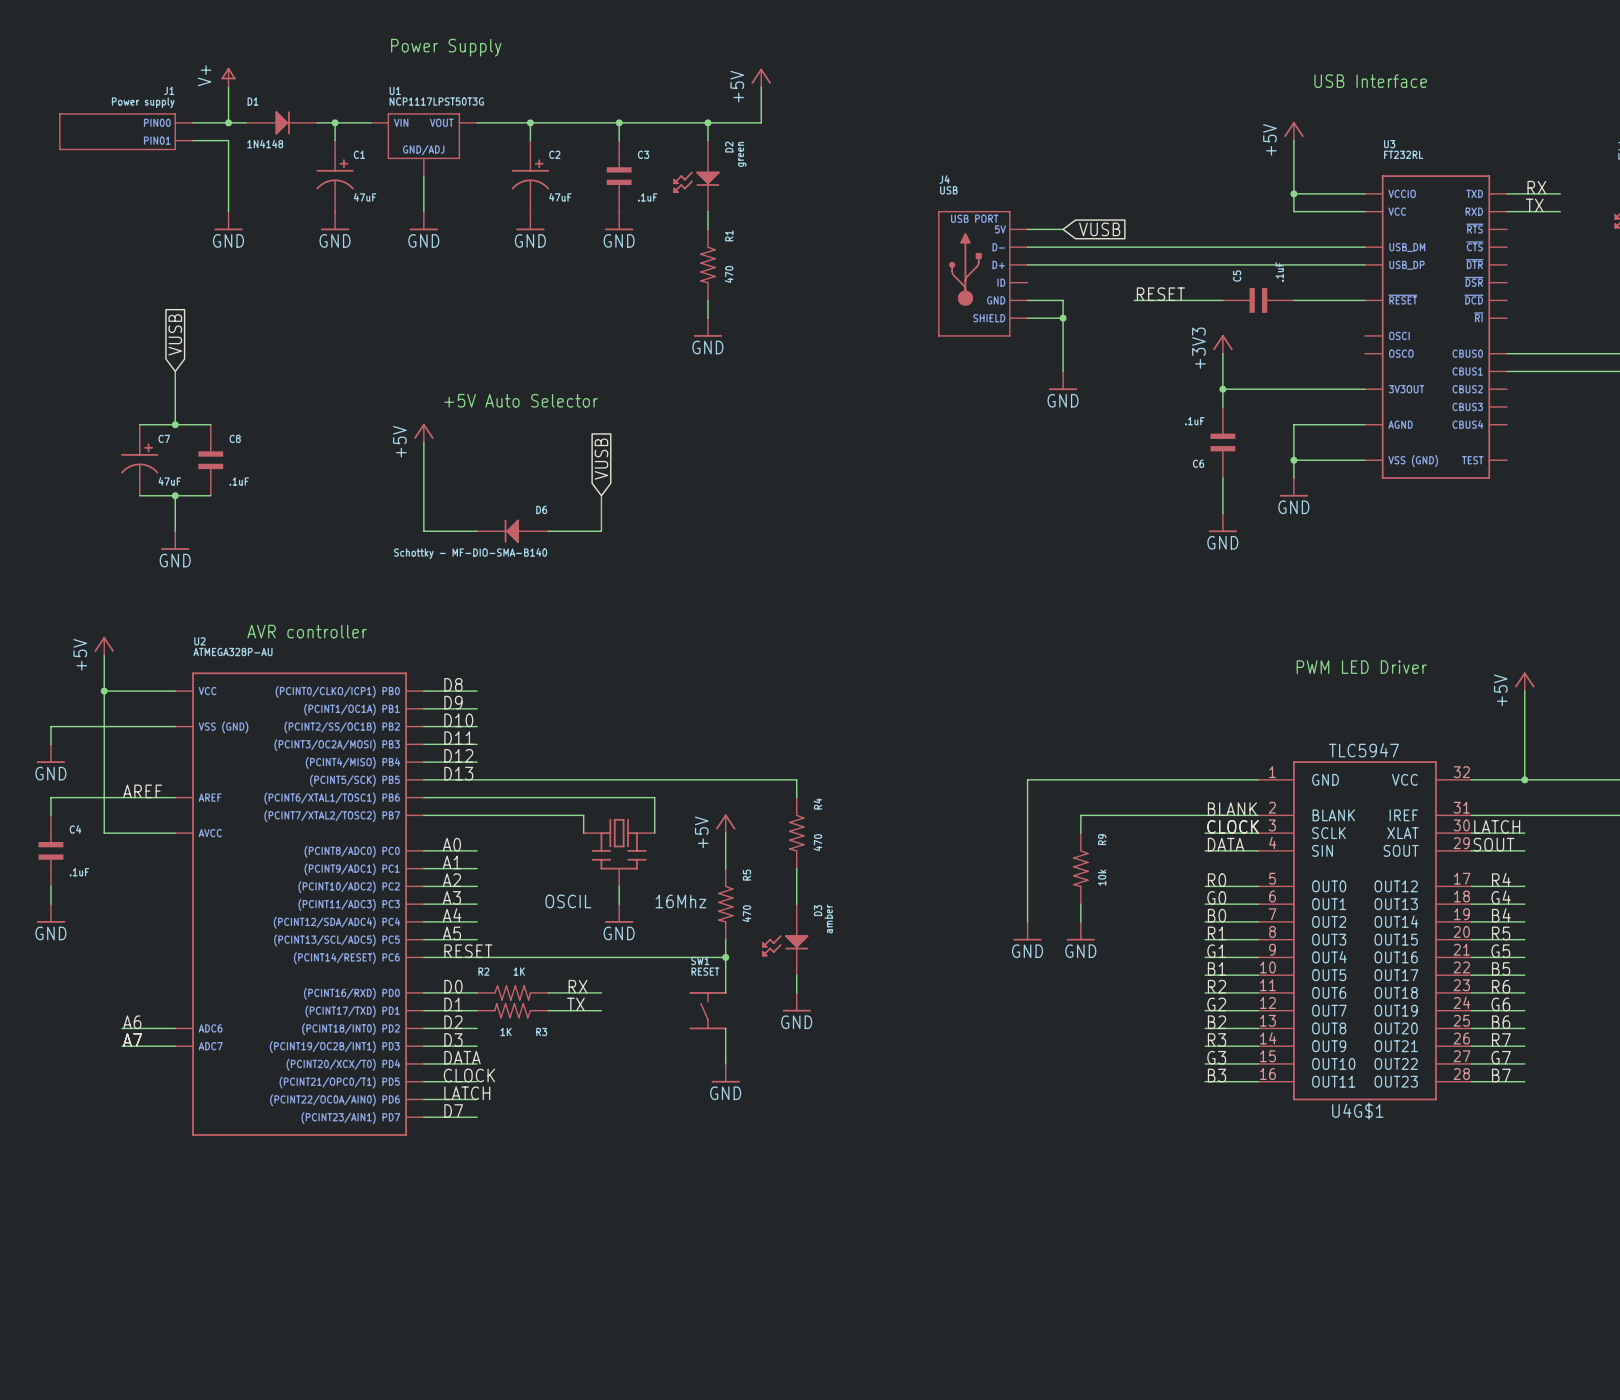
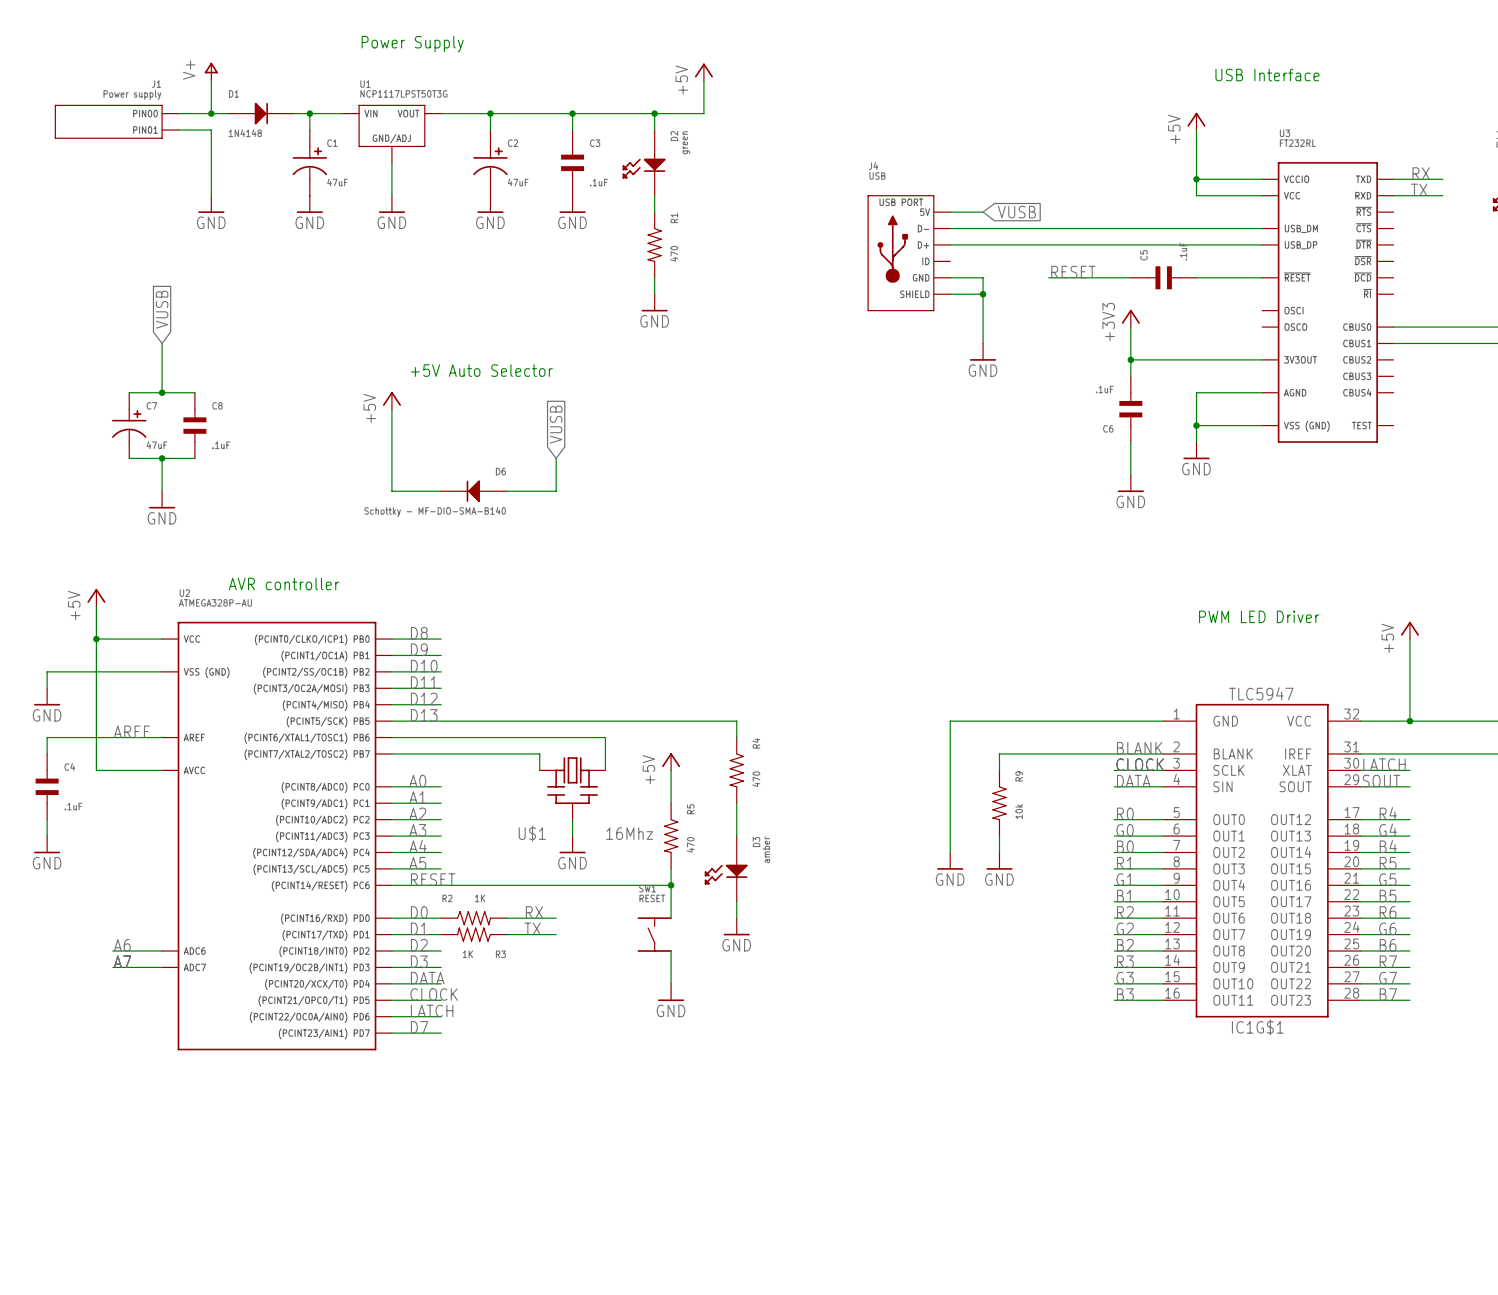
OSCIL name: OSCIL (568, 901) -> U$1 (532, 833)
U4G$1 name: U4G$1 (1357, 1111) -> IC1G$1 (1257, 1027)

